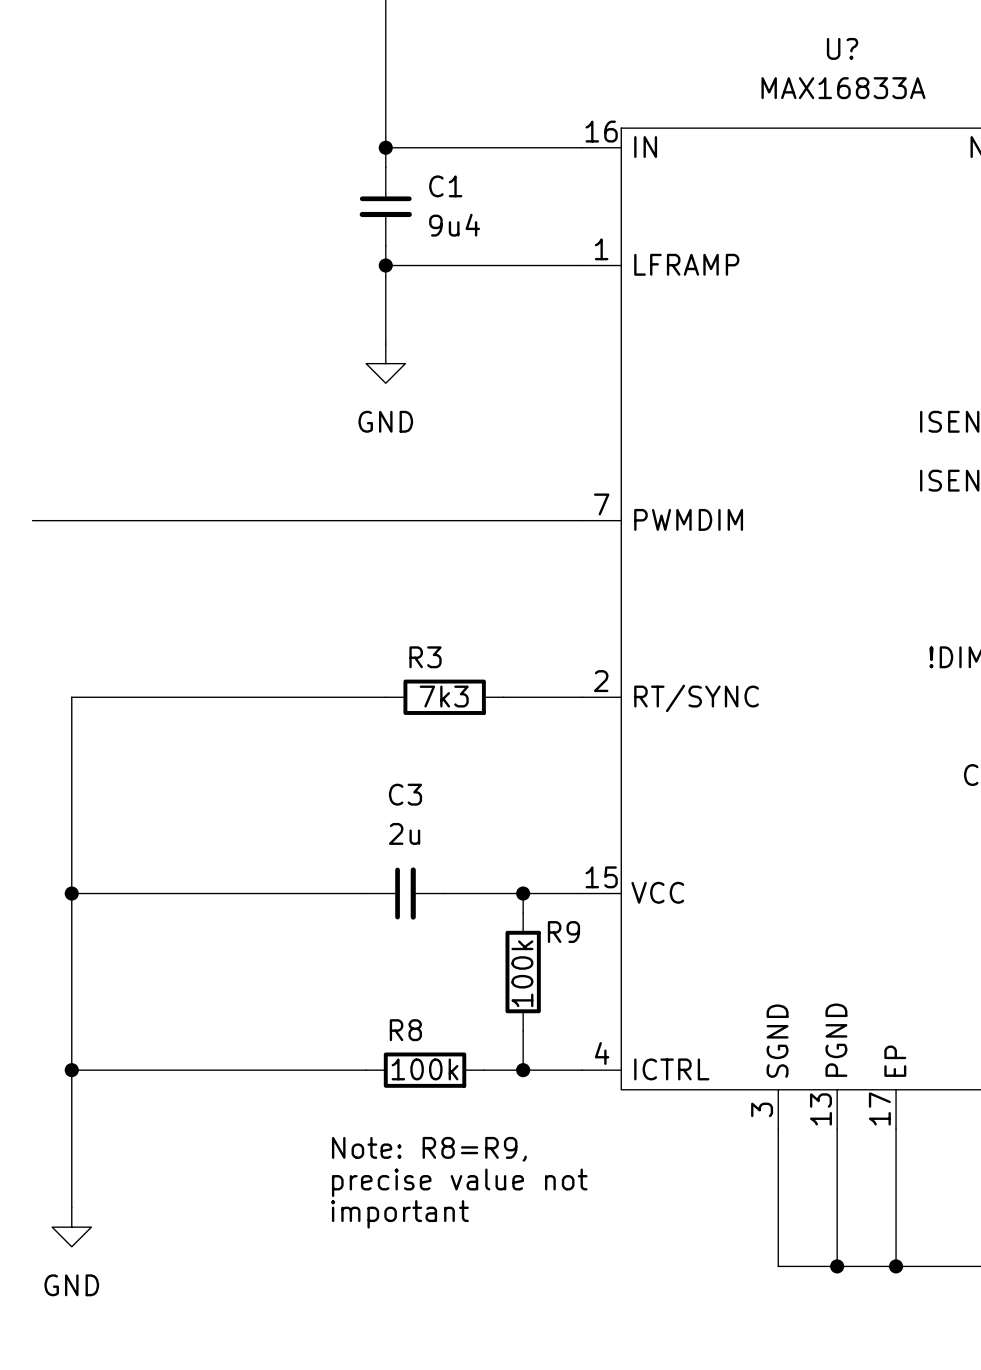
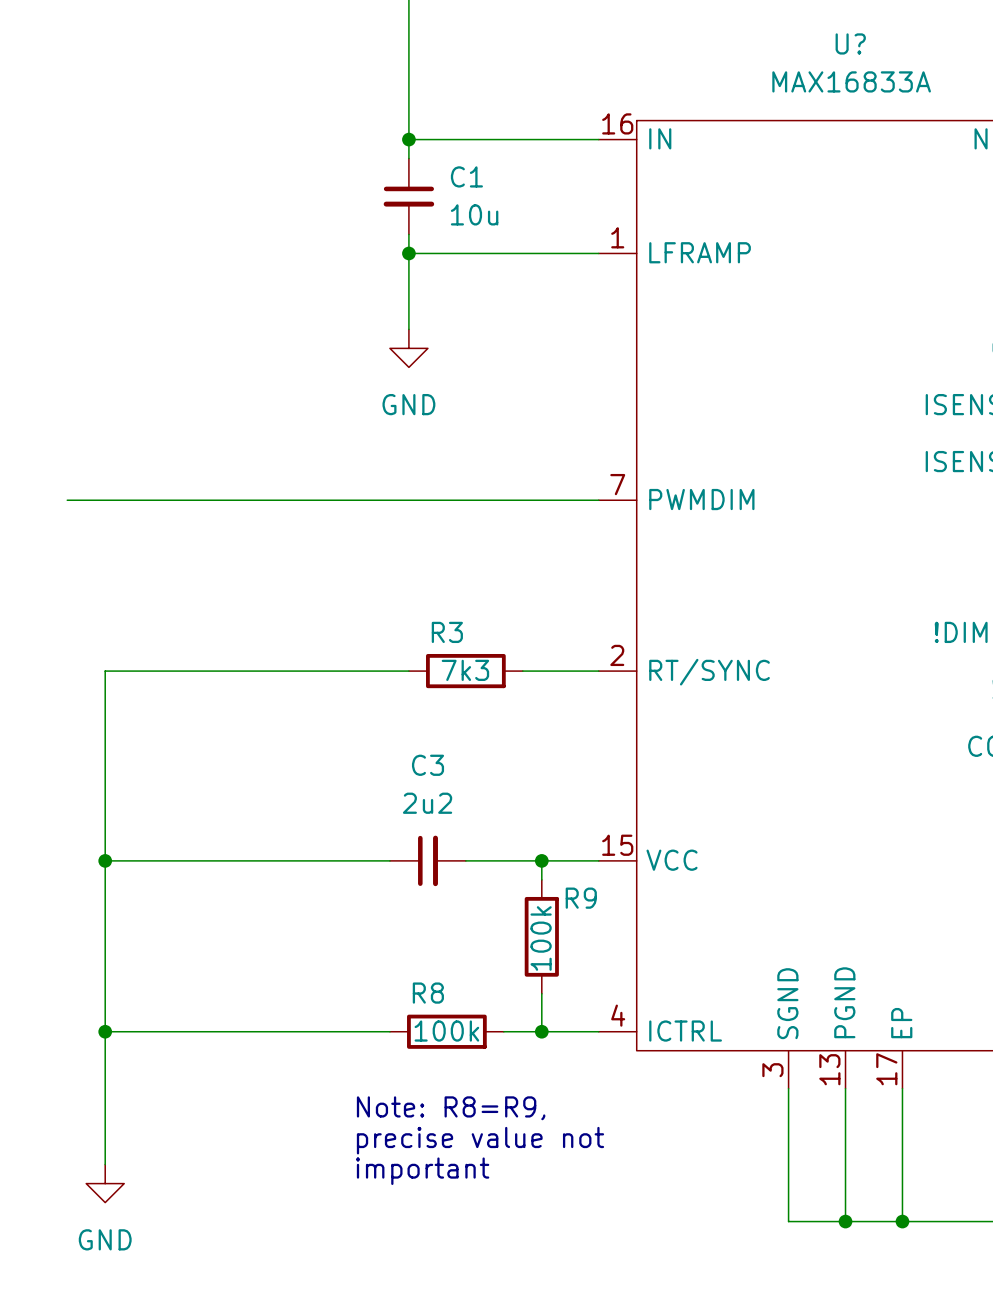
C1 value: 9u4 (454, 225) -> 10u (474, 214)
C3 value: 2u (404, 833) -> 2u2 (427, 803)

